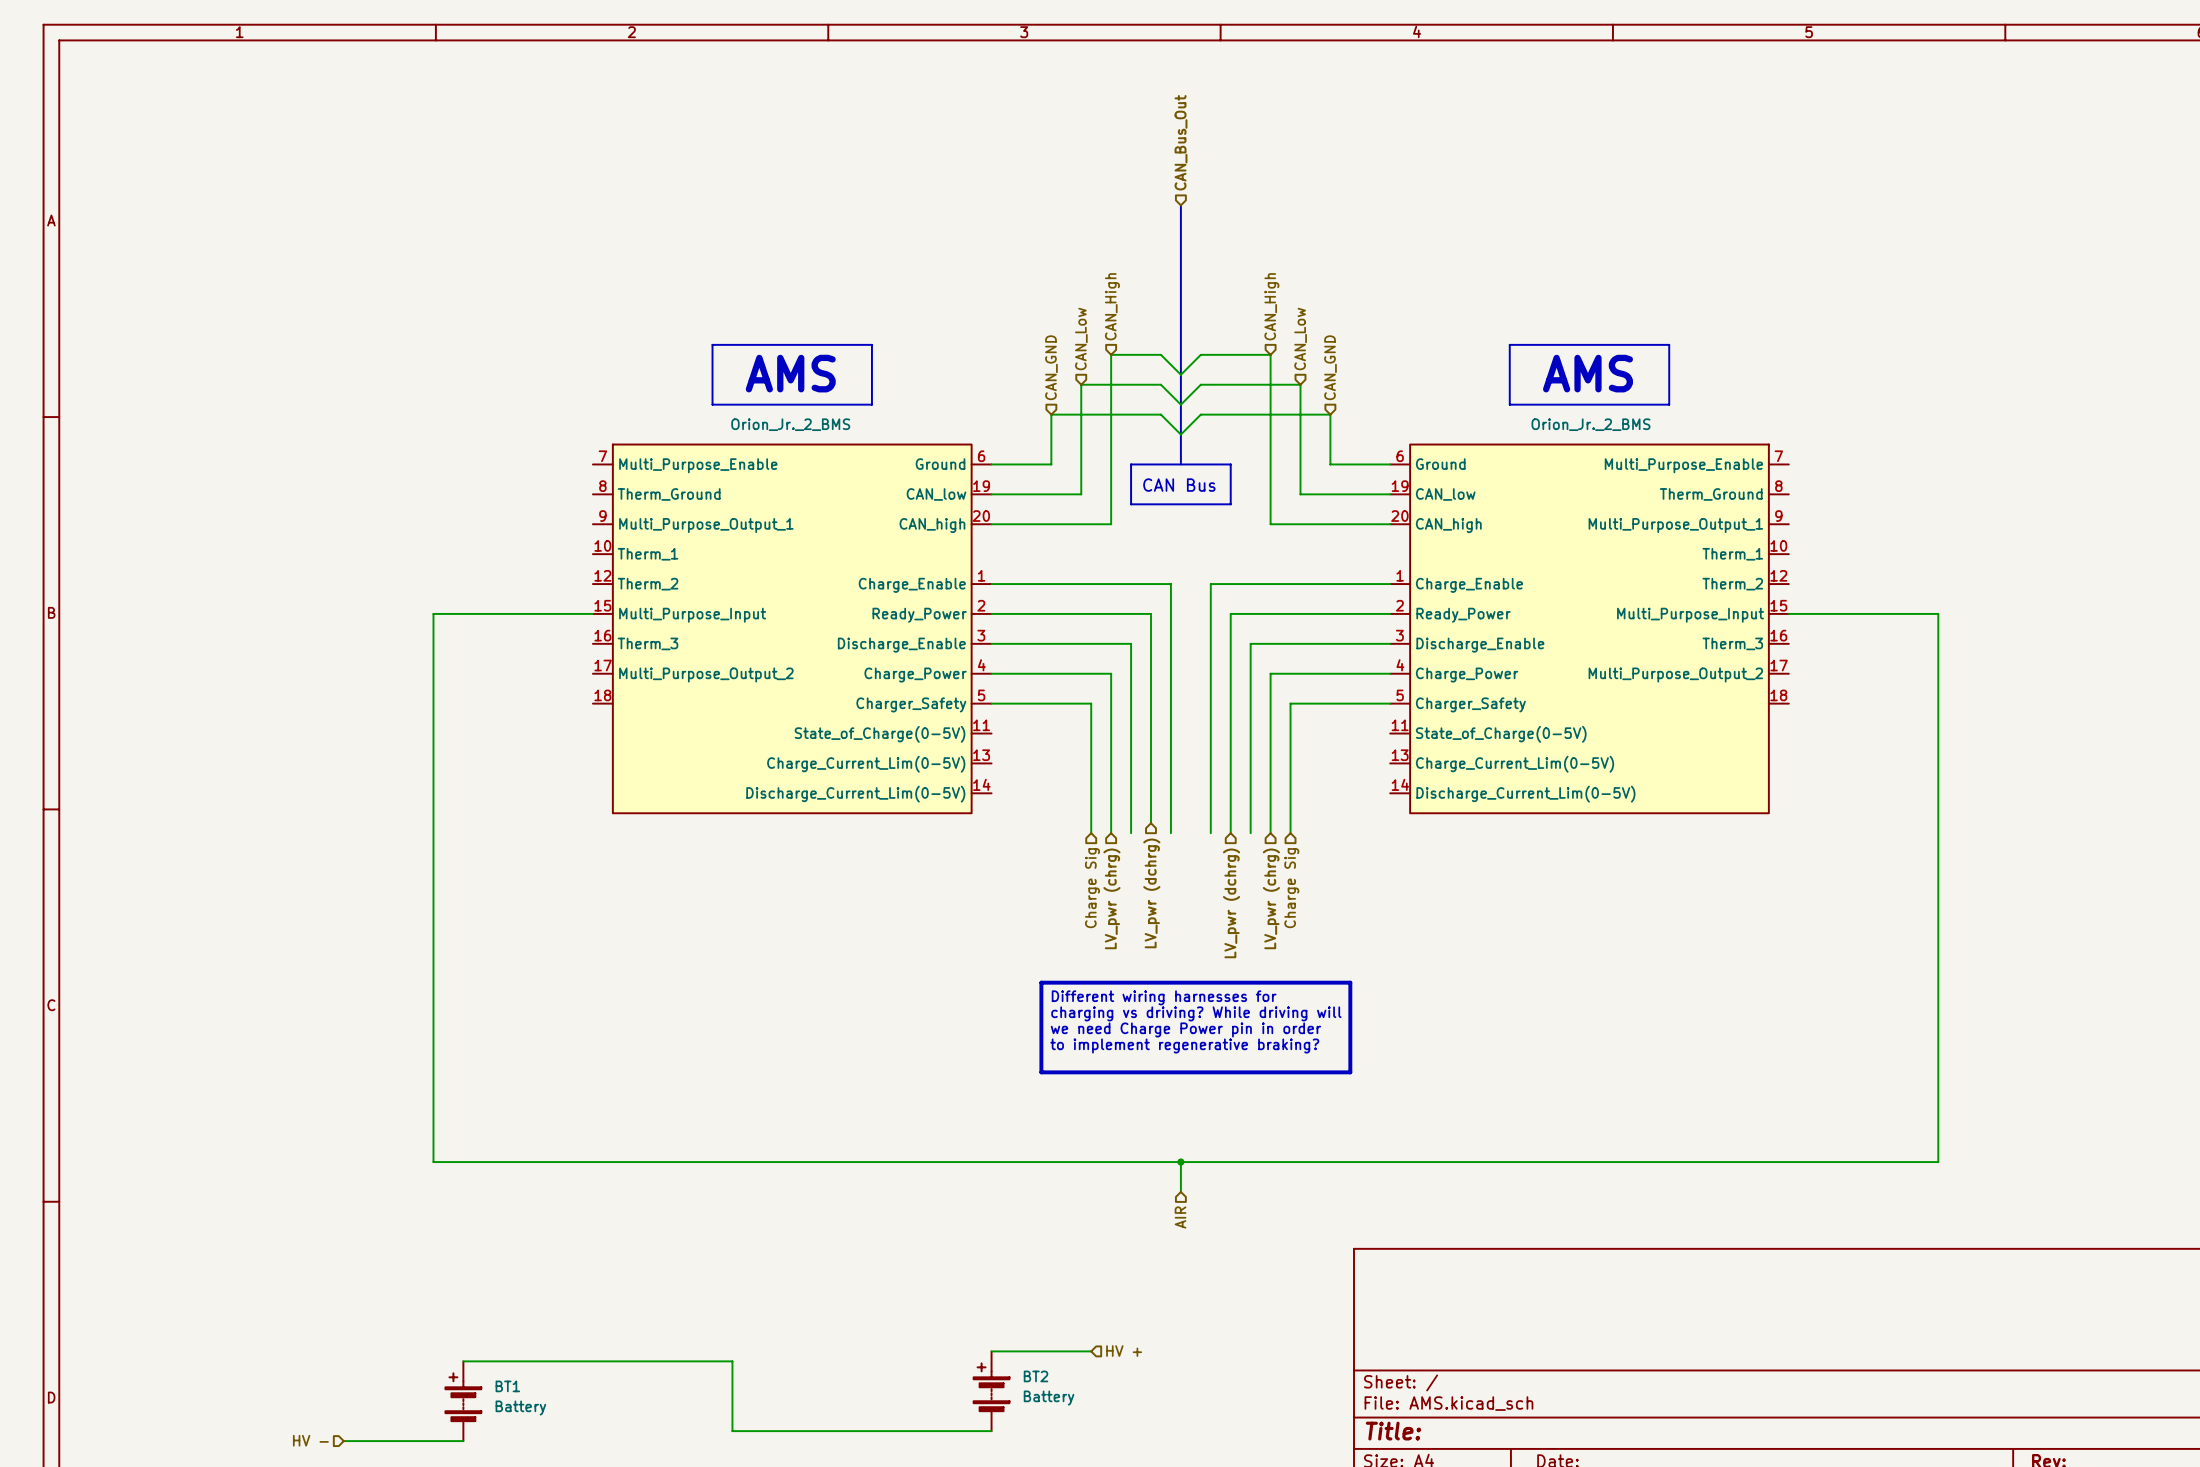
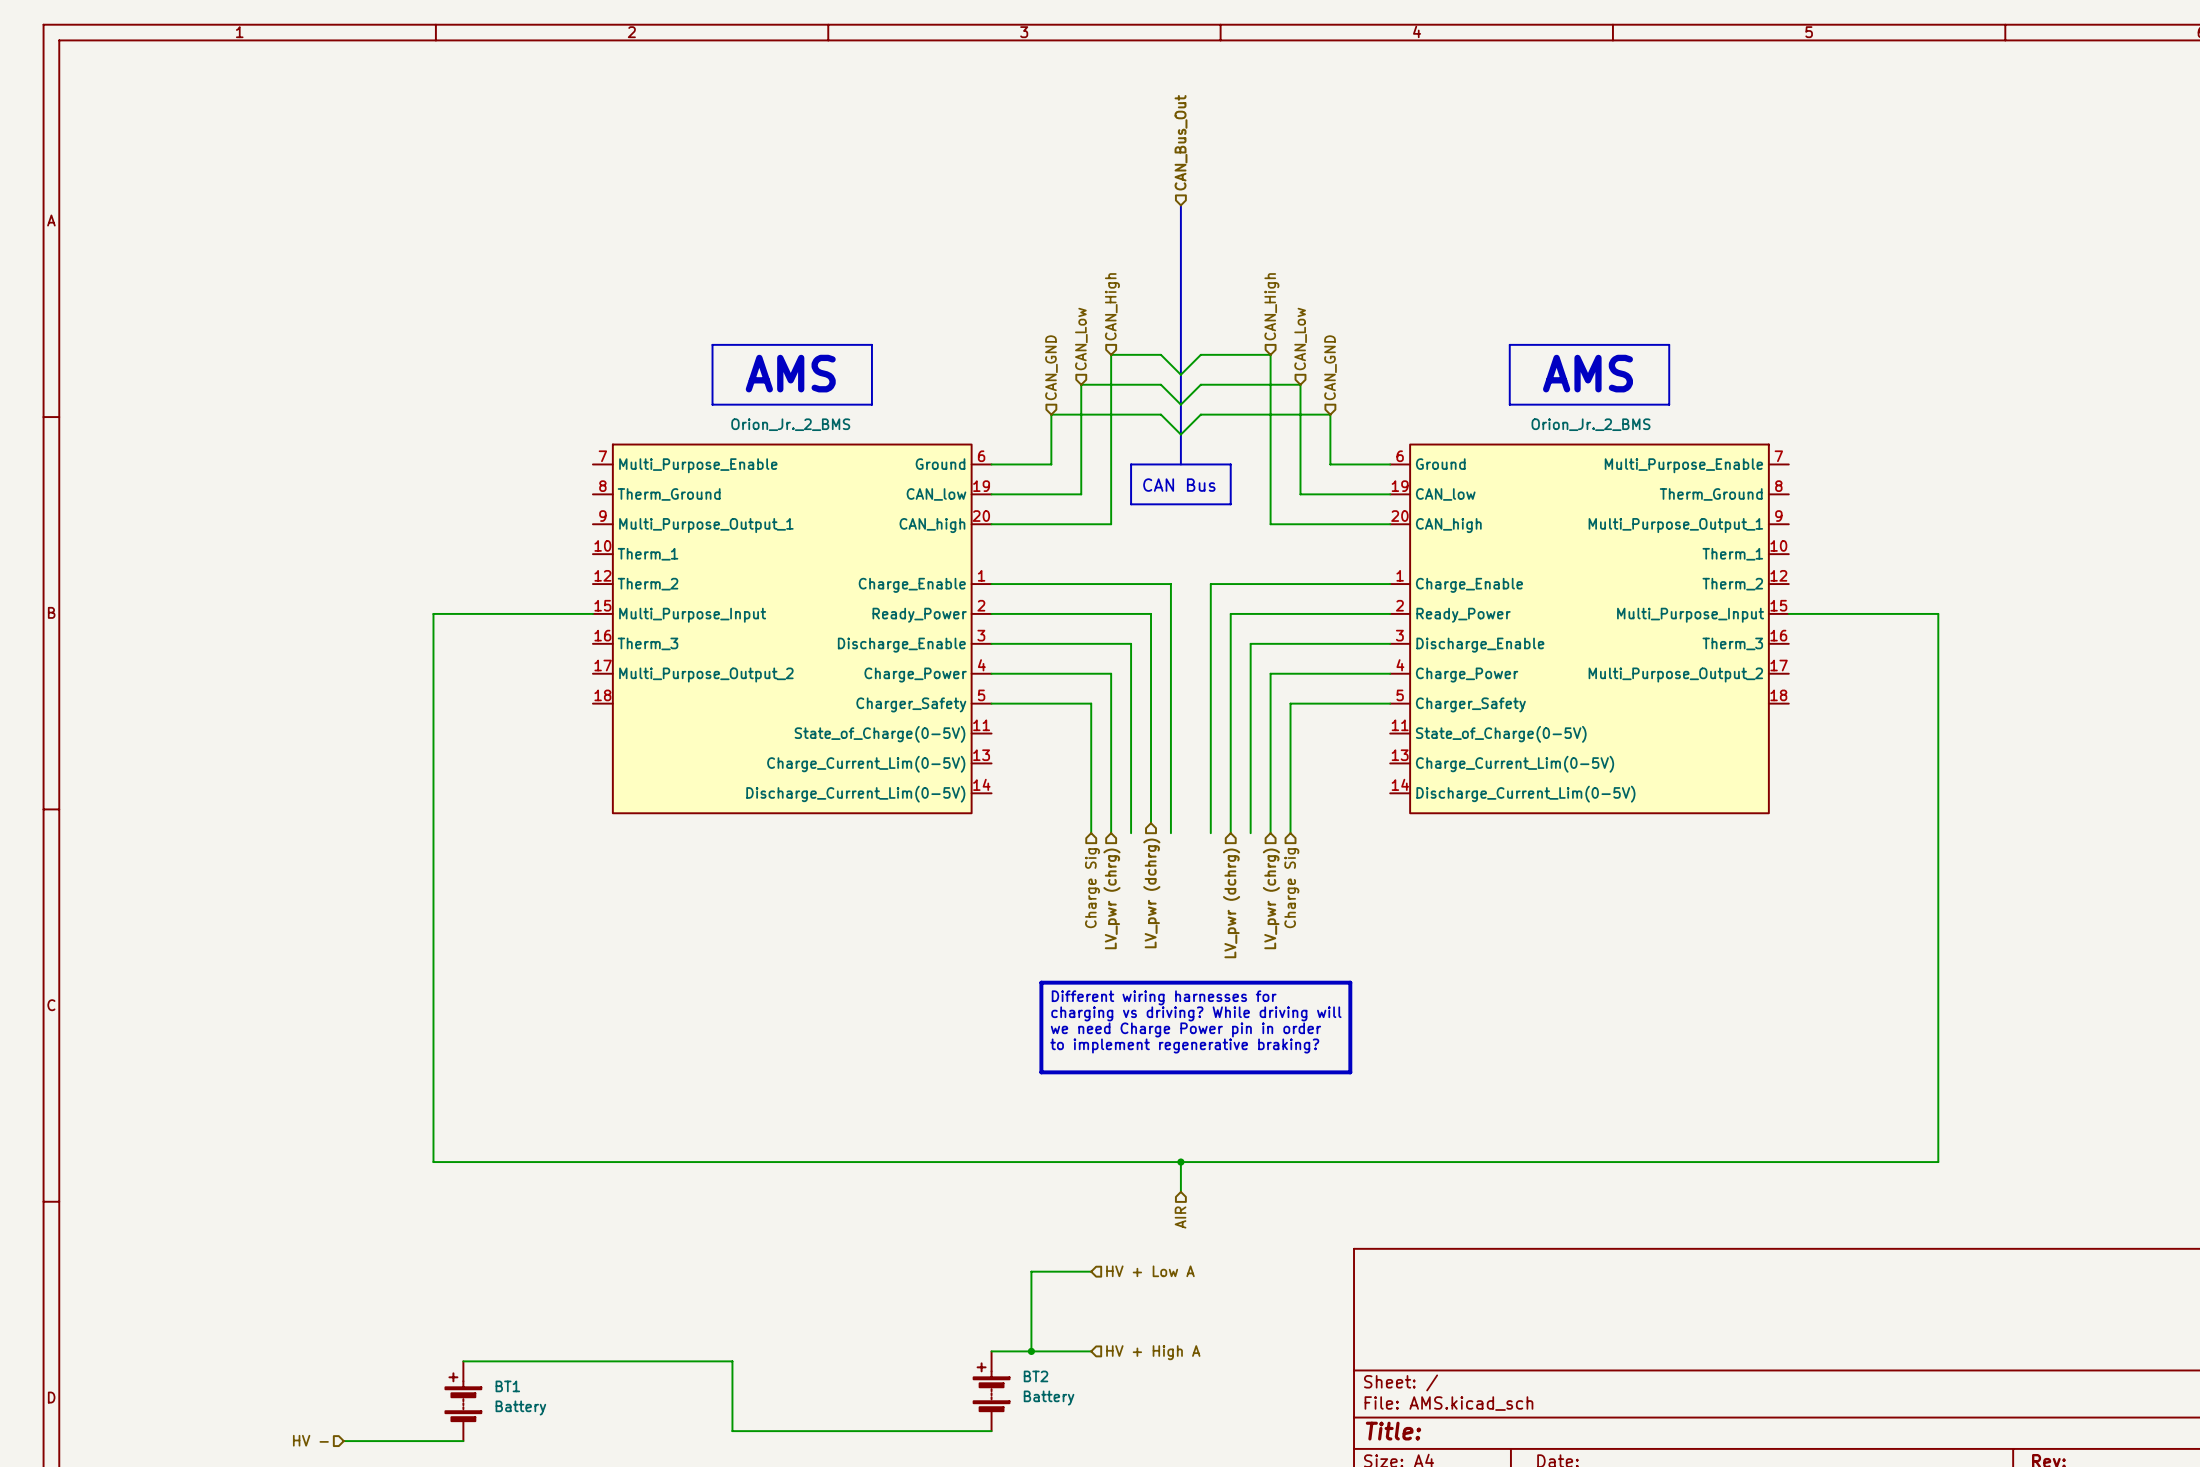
wire: none -> (1091, 1271) (1031, 1271) (1031, 1351)
hierarchical label: none -> HV + Low A (1150, 1271)
junction: none -> (1031, 1351)
hierarchical label: HV + (1124, 1351) -> HV + High A (1153, 1352)

